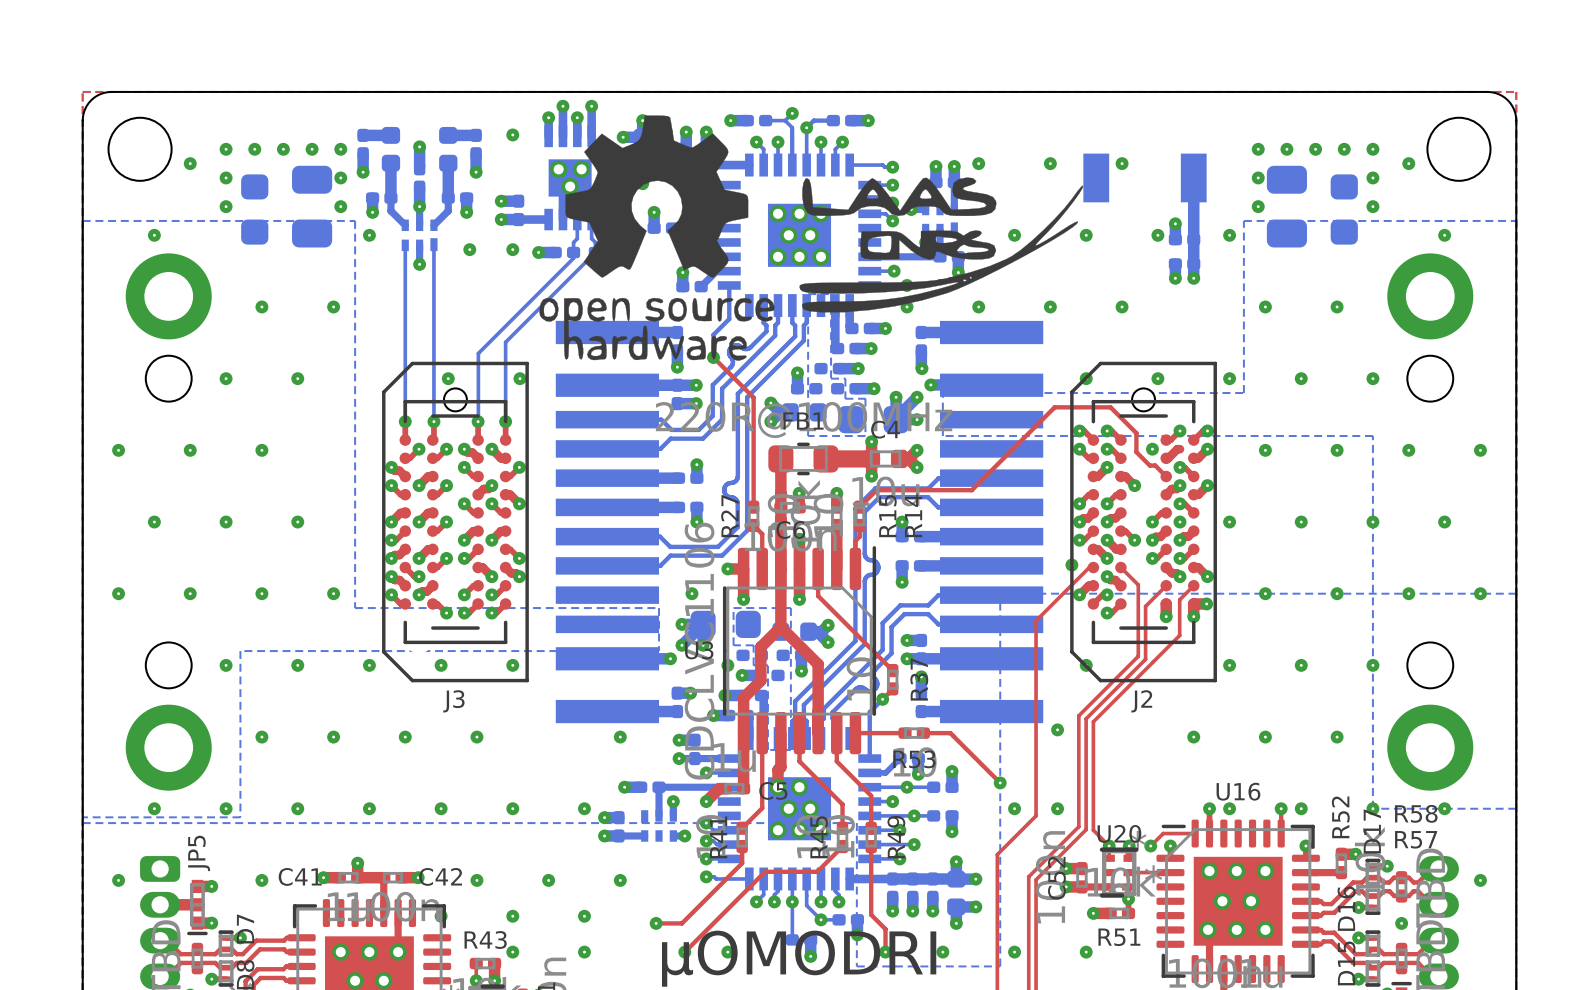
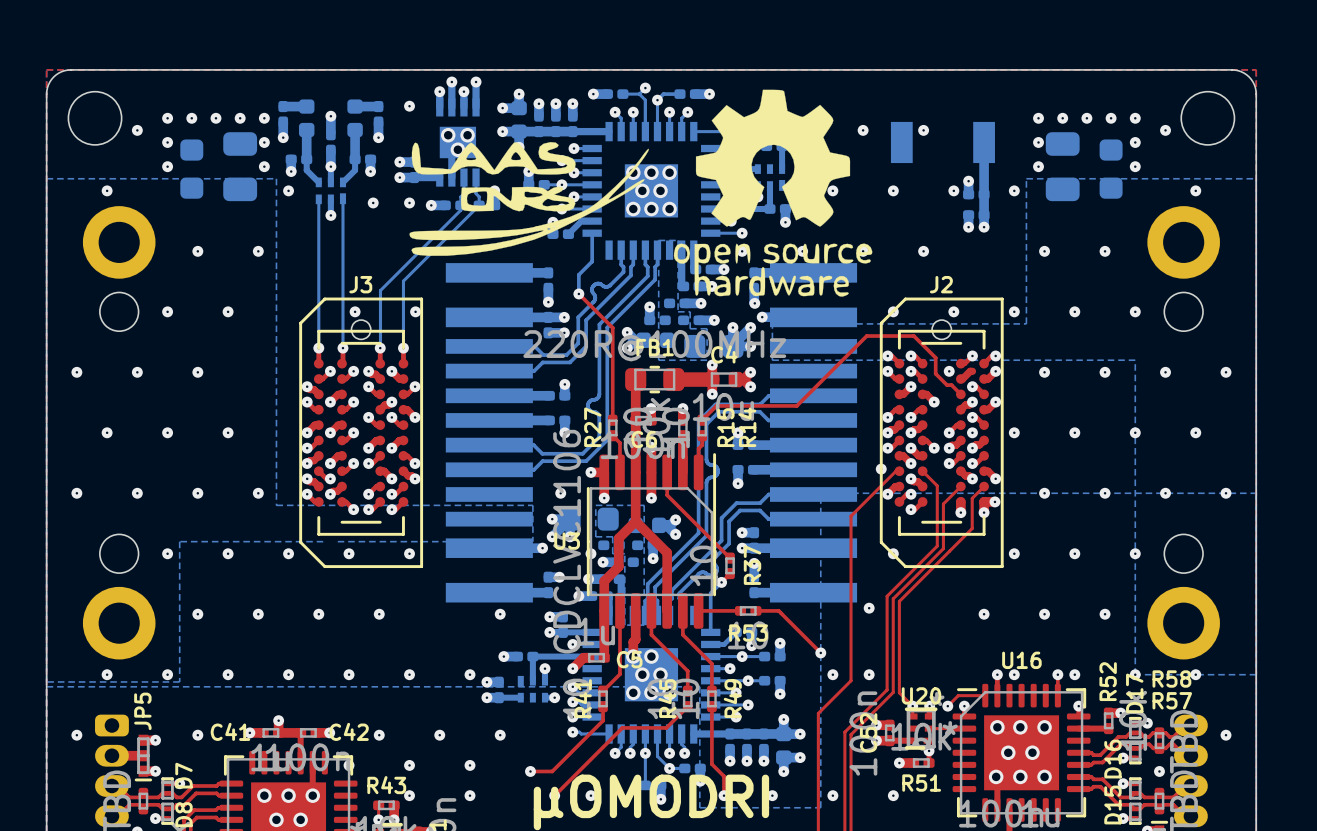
drawing position: (656, 238) -> (773, 193)
drawing position: (941, 244) -> (529, 198)
J3 name position: J3 (453, 701) -> J3 (360, 284)
J2 name position: J2 (1141, 701) -> J2 (941, 284)

